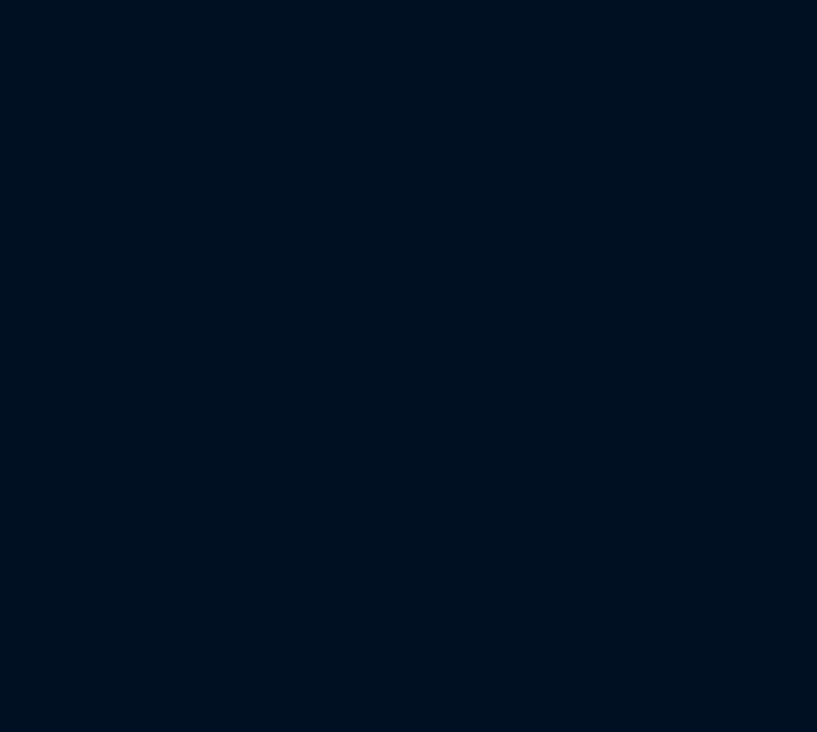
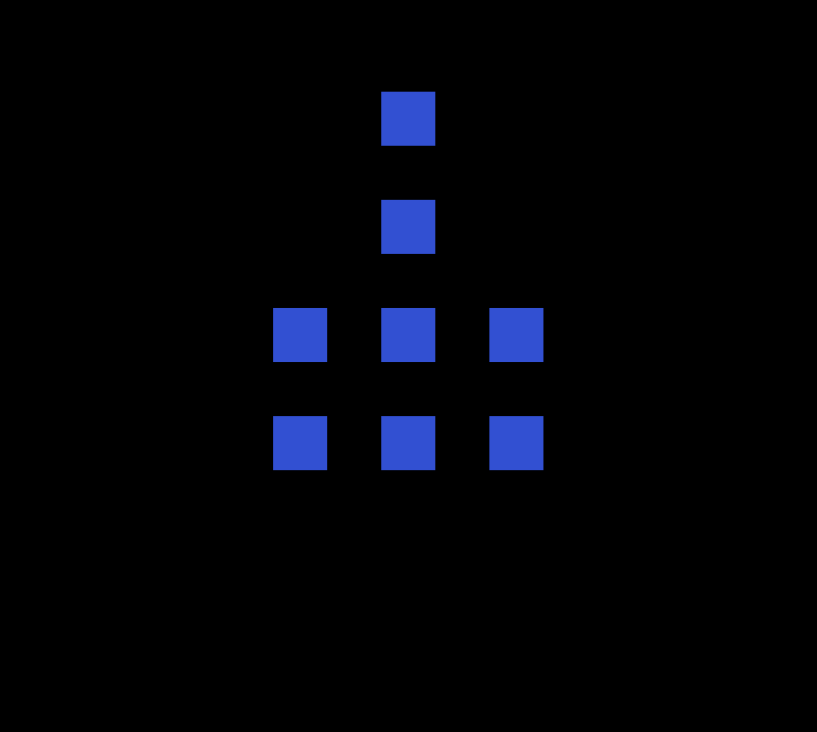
part: none -> (408, 172)
part: none -> (462, 335)
part: none -> (300, 389)
part: none -> (462, 443)

